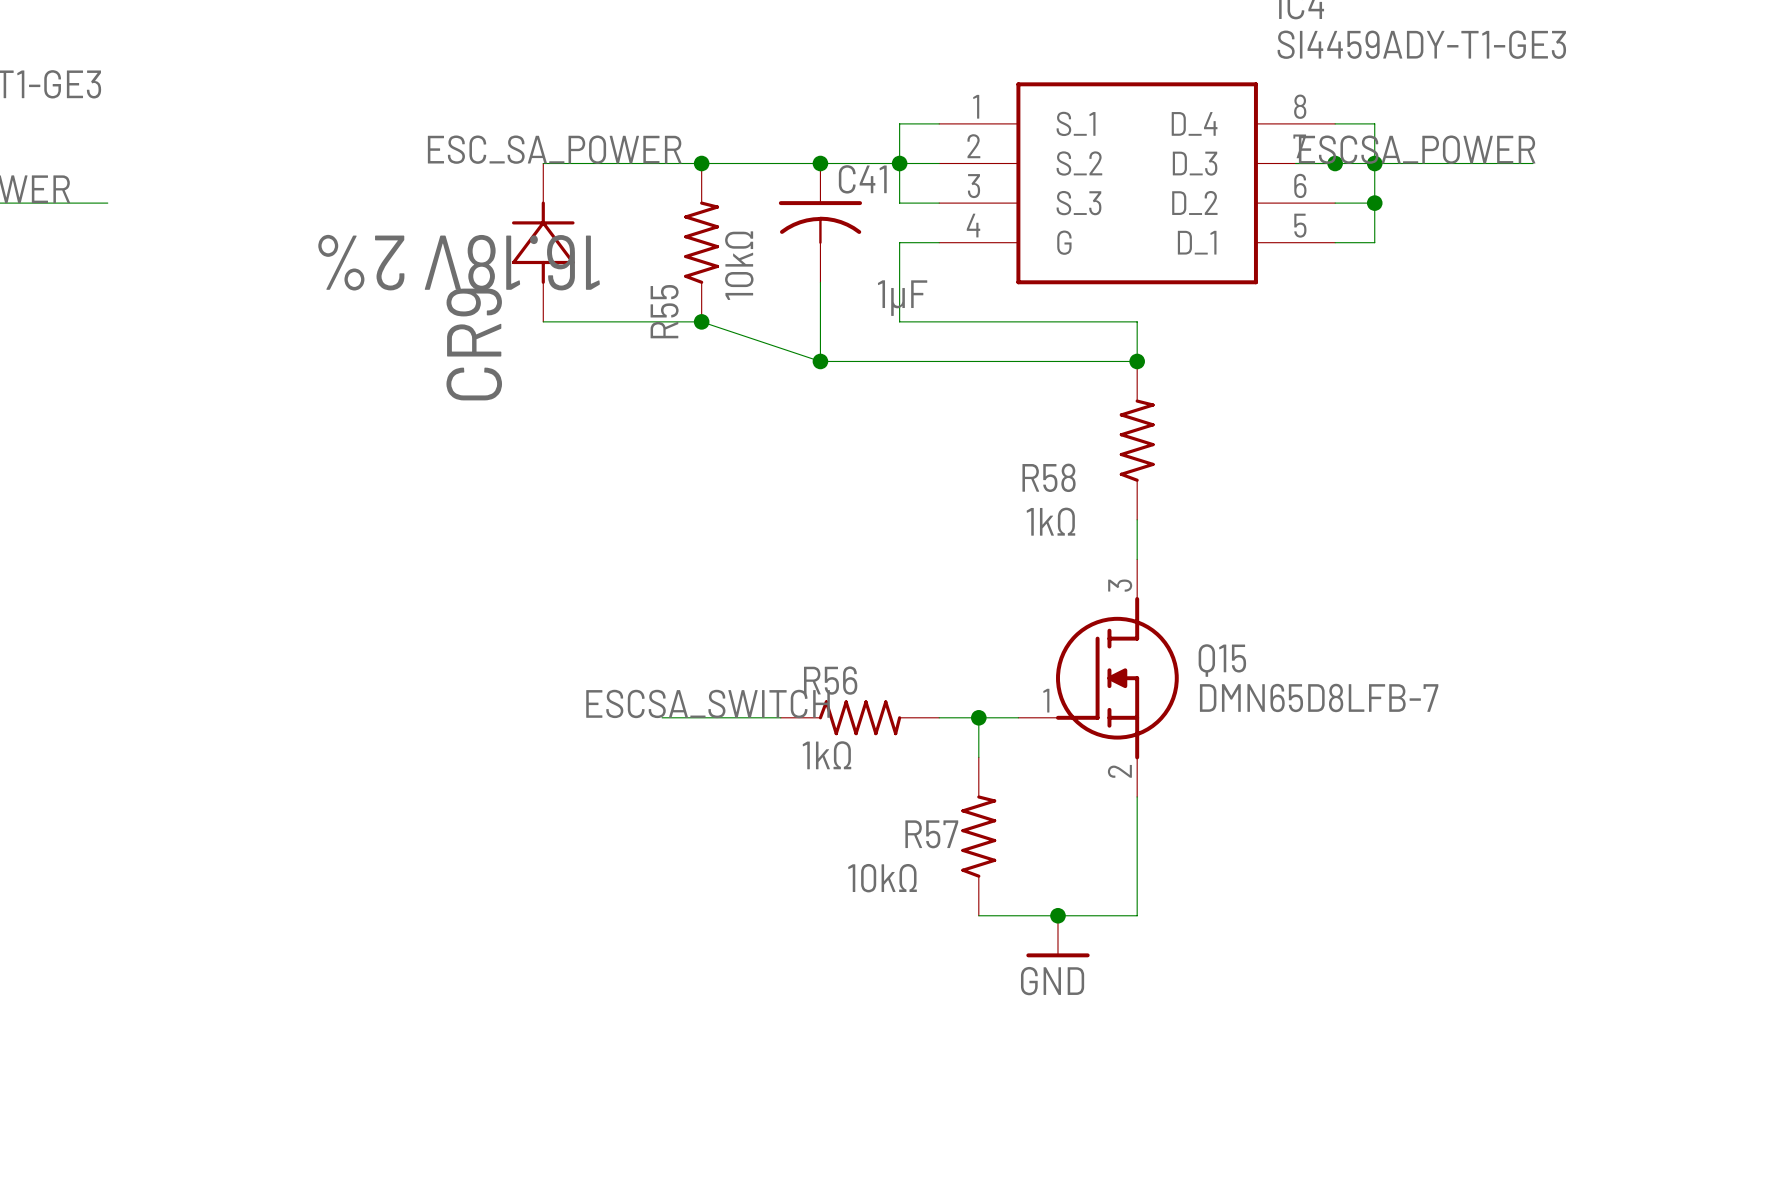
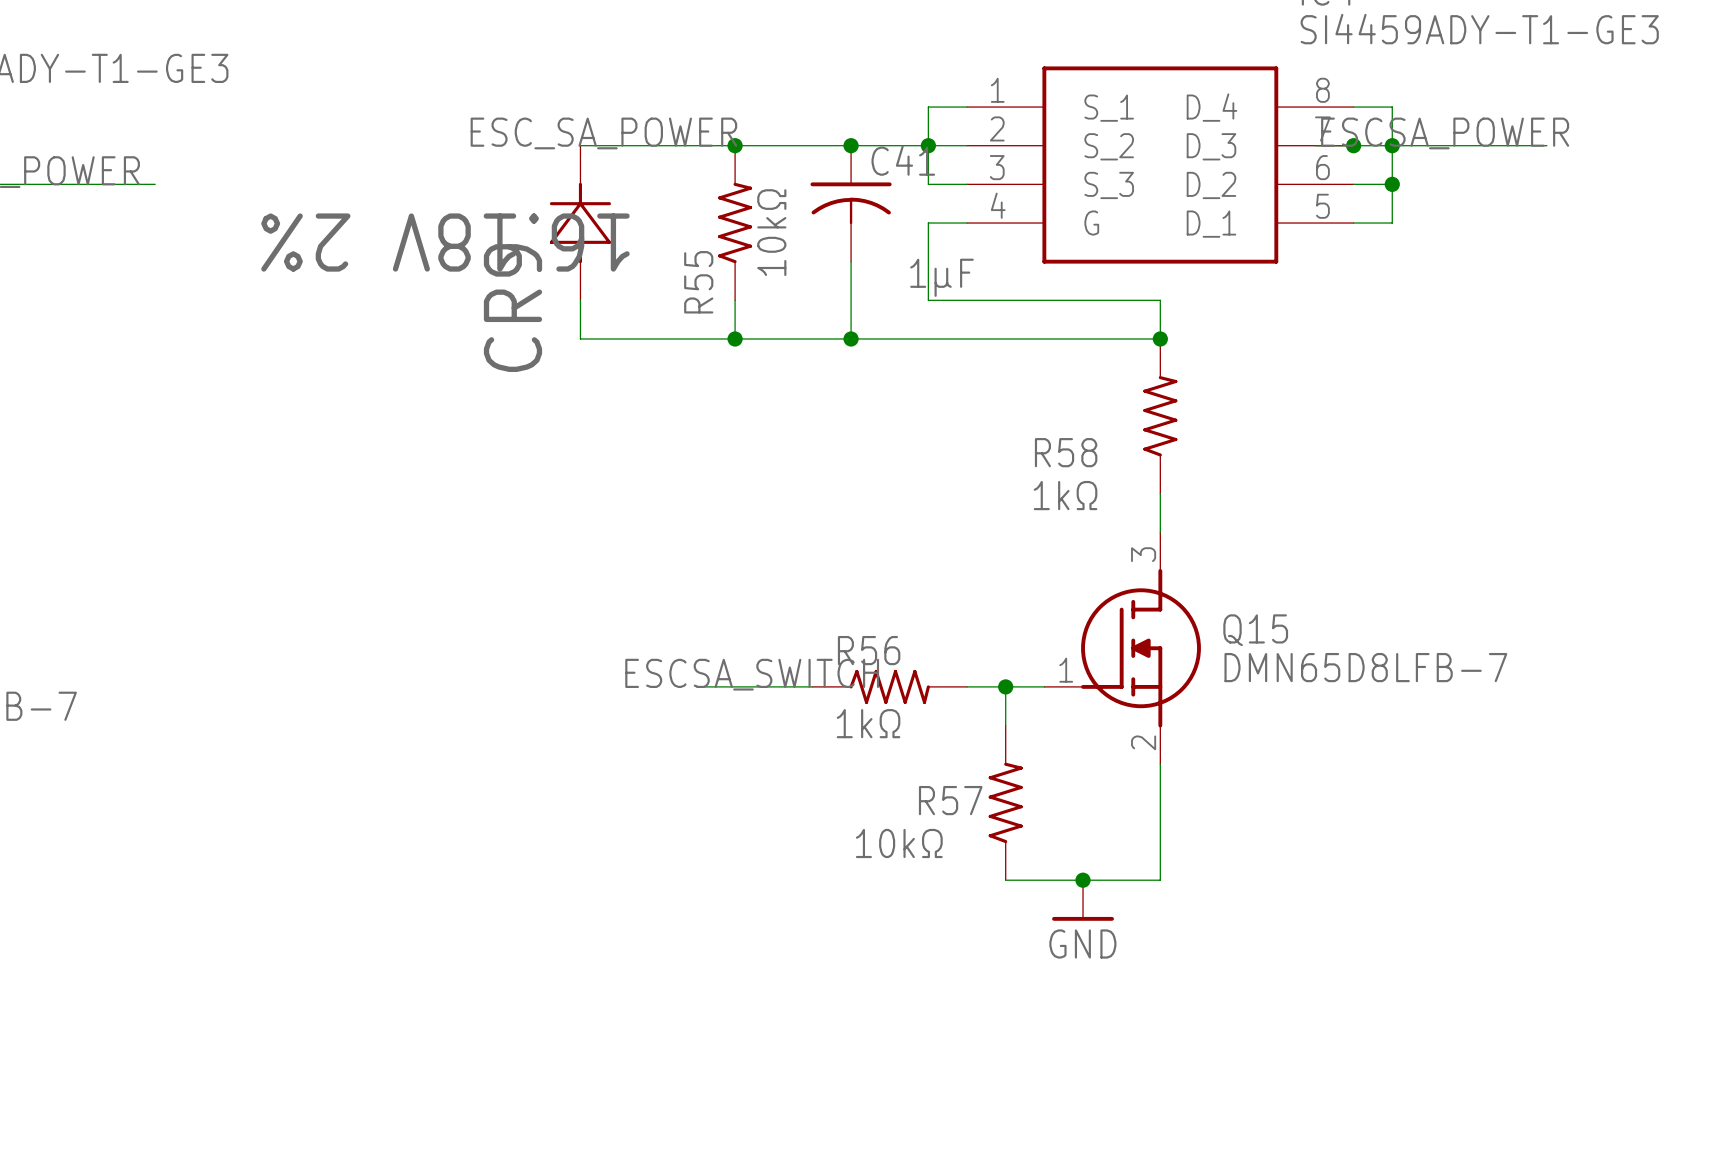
wire: (543, 321) (701, 321) (820, 361) -> (580, 300) (580, 338) (851, 338)
wire: none -> (735, 300) (735, 338)
junction position: (701, 321) -> (735, 338)

